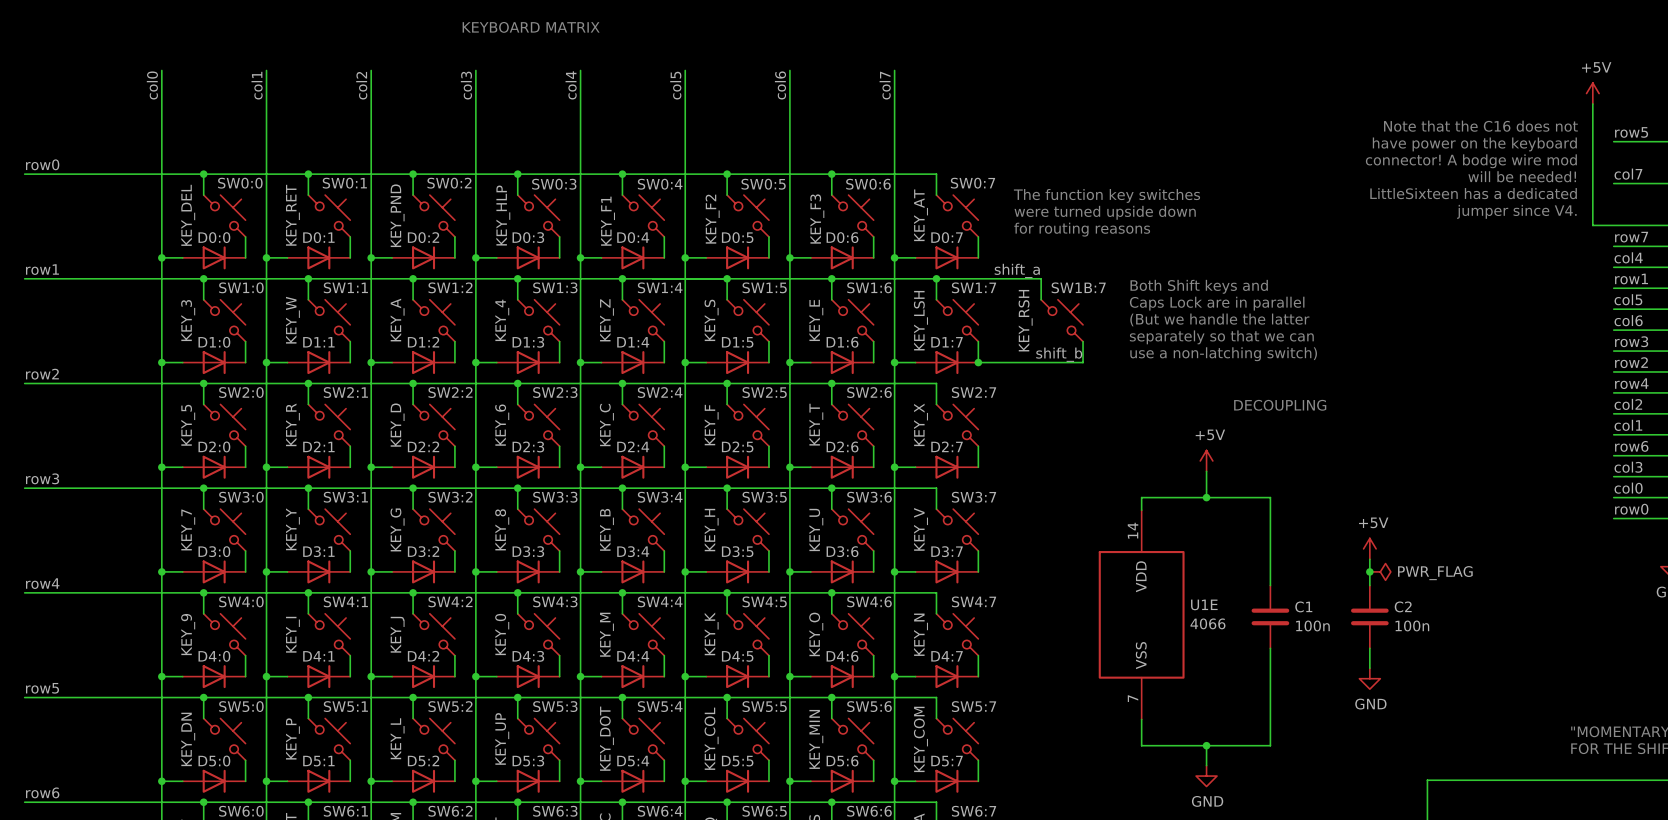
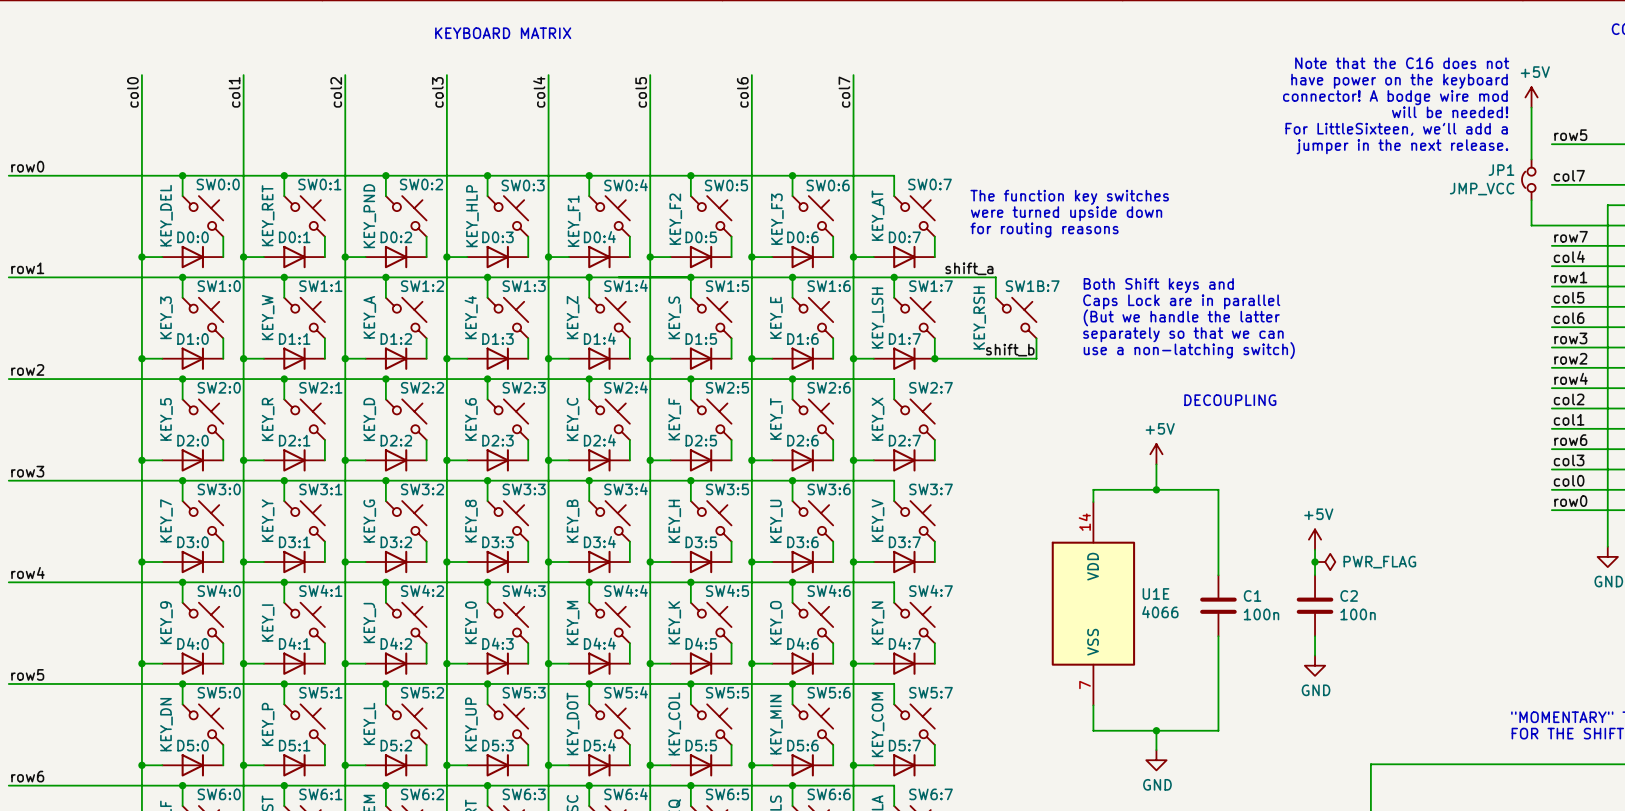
text: none -> Note that the C16 does not (1402, 63)
text: none -> have power on the keyboard (1399, 81)
text: Note that the C16 does not (1480, 126) -> For LittleSixteen, we'll add a (1396, 129)
text: have power on the keyboard (1474, 144) -> jumper in the next release. (1402, 146)
text position: connector! A bodge wire mod (1471, 161) -> connector! A bodge wire mod (1395, 97)
text position: will be needed! (1522, 176) -> will be needed! (1450, 112)
JP1: none -> JMP_VCC (1528, 179)
text: LittleSixteen has a dedicated (1473, 193) -> none
text: jumper since V4. (1516, 211) -> none

